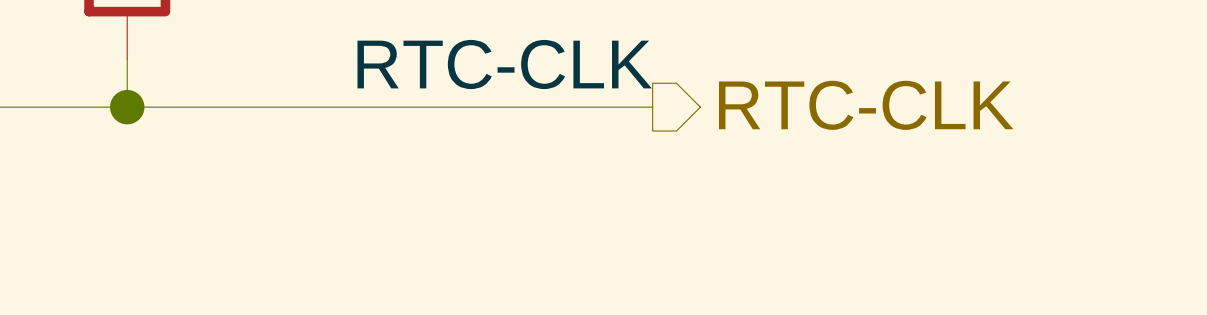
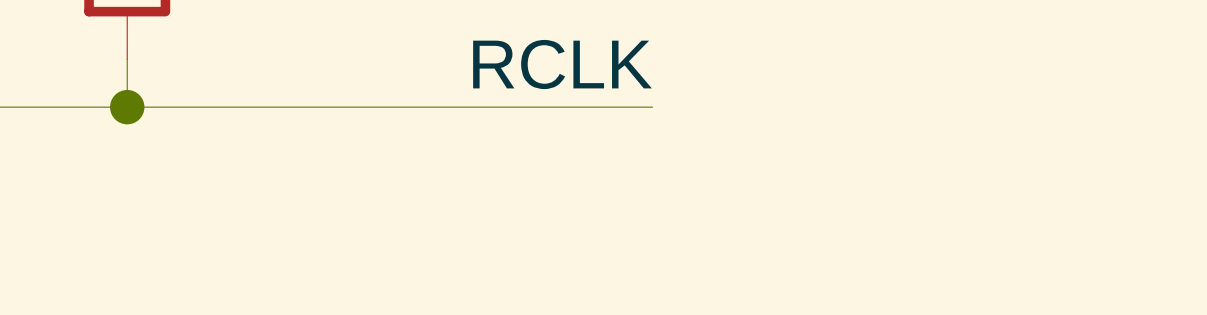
label: RTC-CLK (504, 64) -> RCLK (562, 64)
hierarchical label: RTC-CLK (866, 105) -> none

